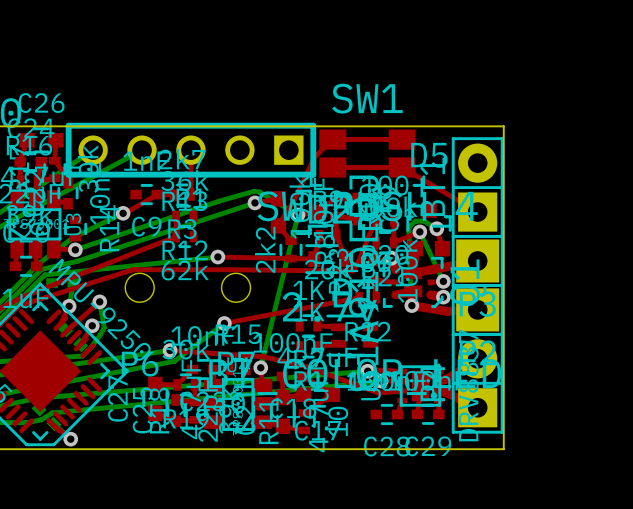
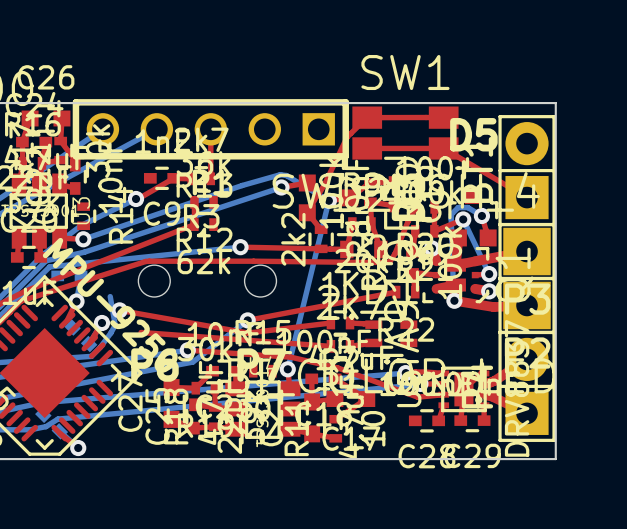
top track: (99, 301) (67, 330) -> none
via position: (99, 301) -> (119, 310)
top track: none -> (119, 310) (247, 333) (330, 323)
top track: none -> (141, 332) (330, 346)

